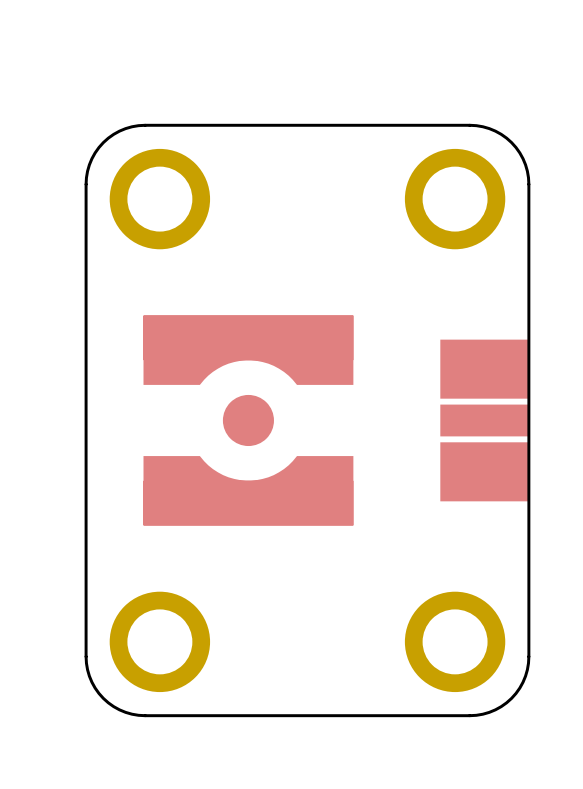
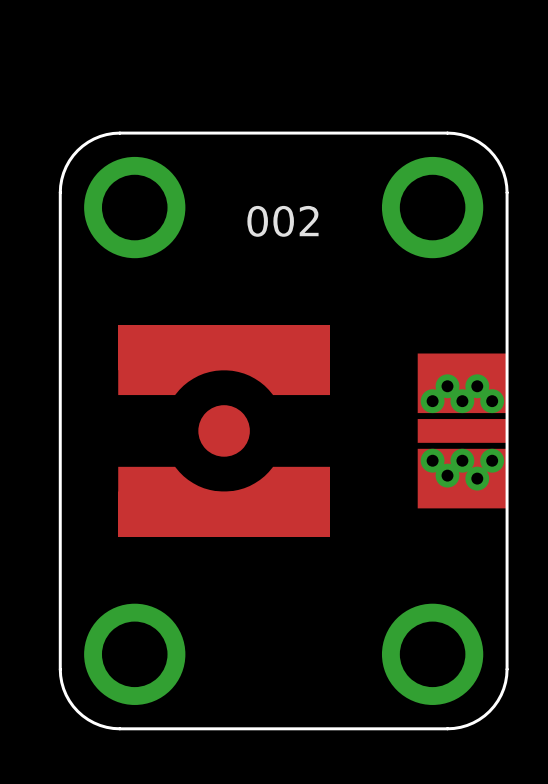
text: none -> 002 (282, 221)
part footprint: [440, 339, 529, 502] -> [417, 353, 508, 509]

